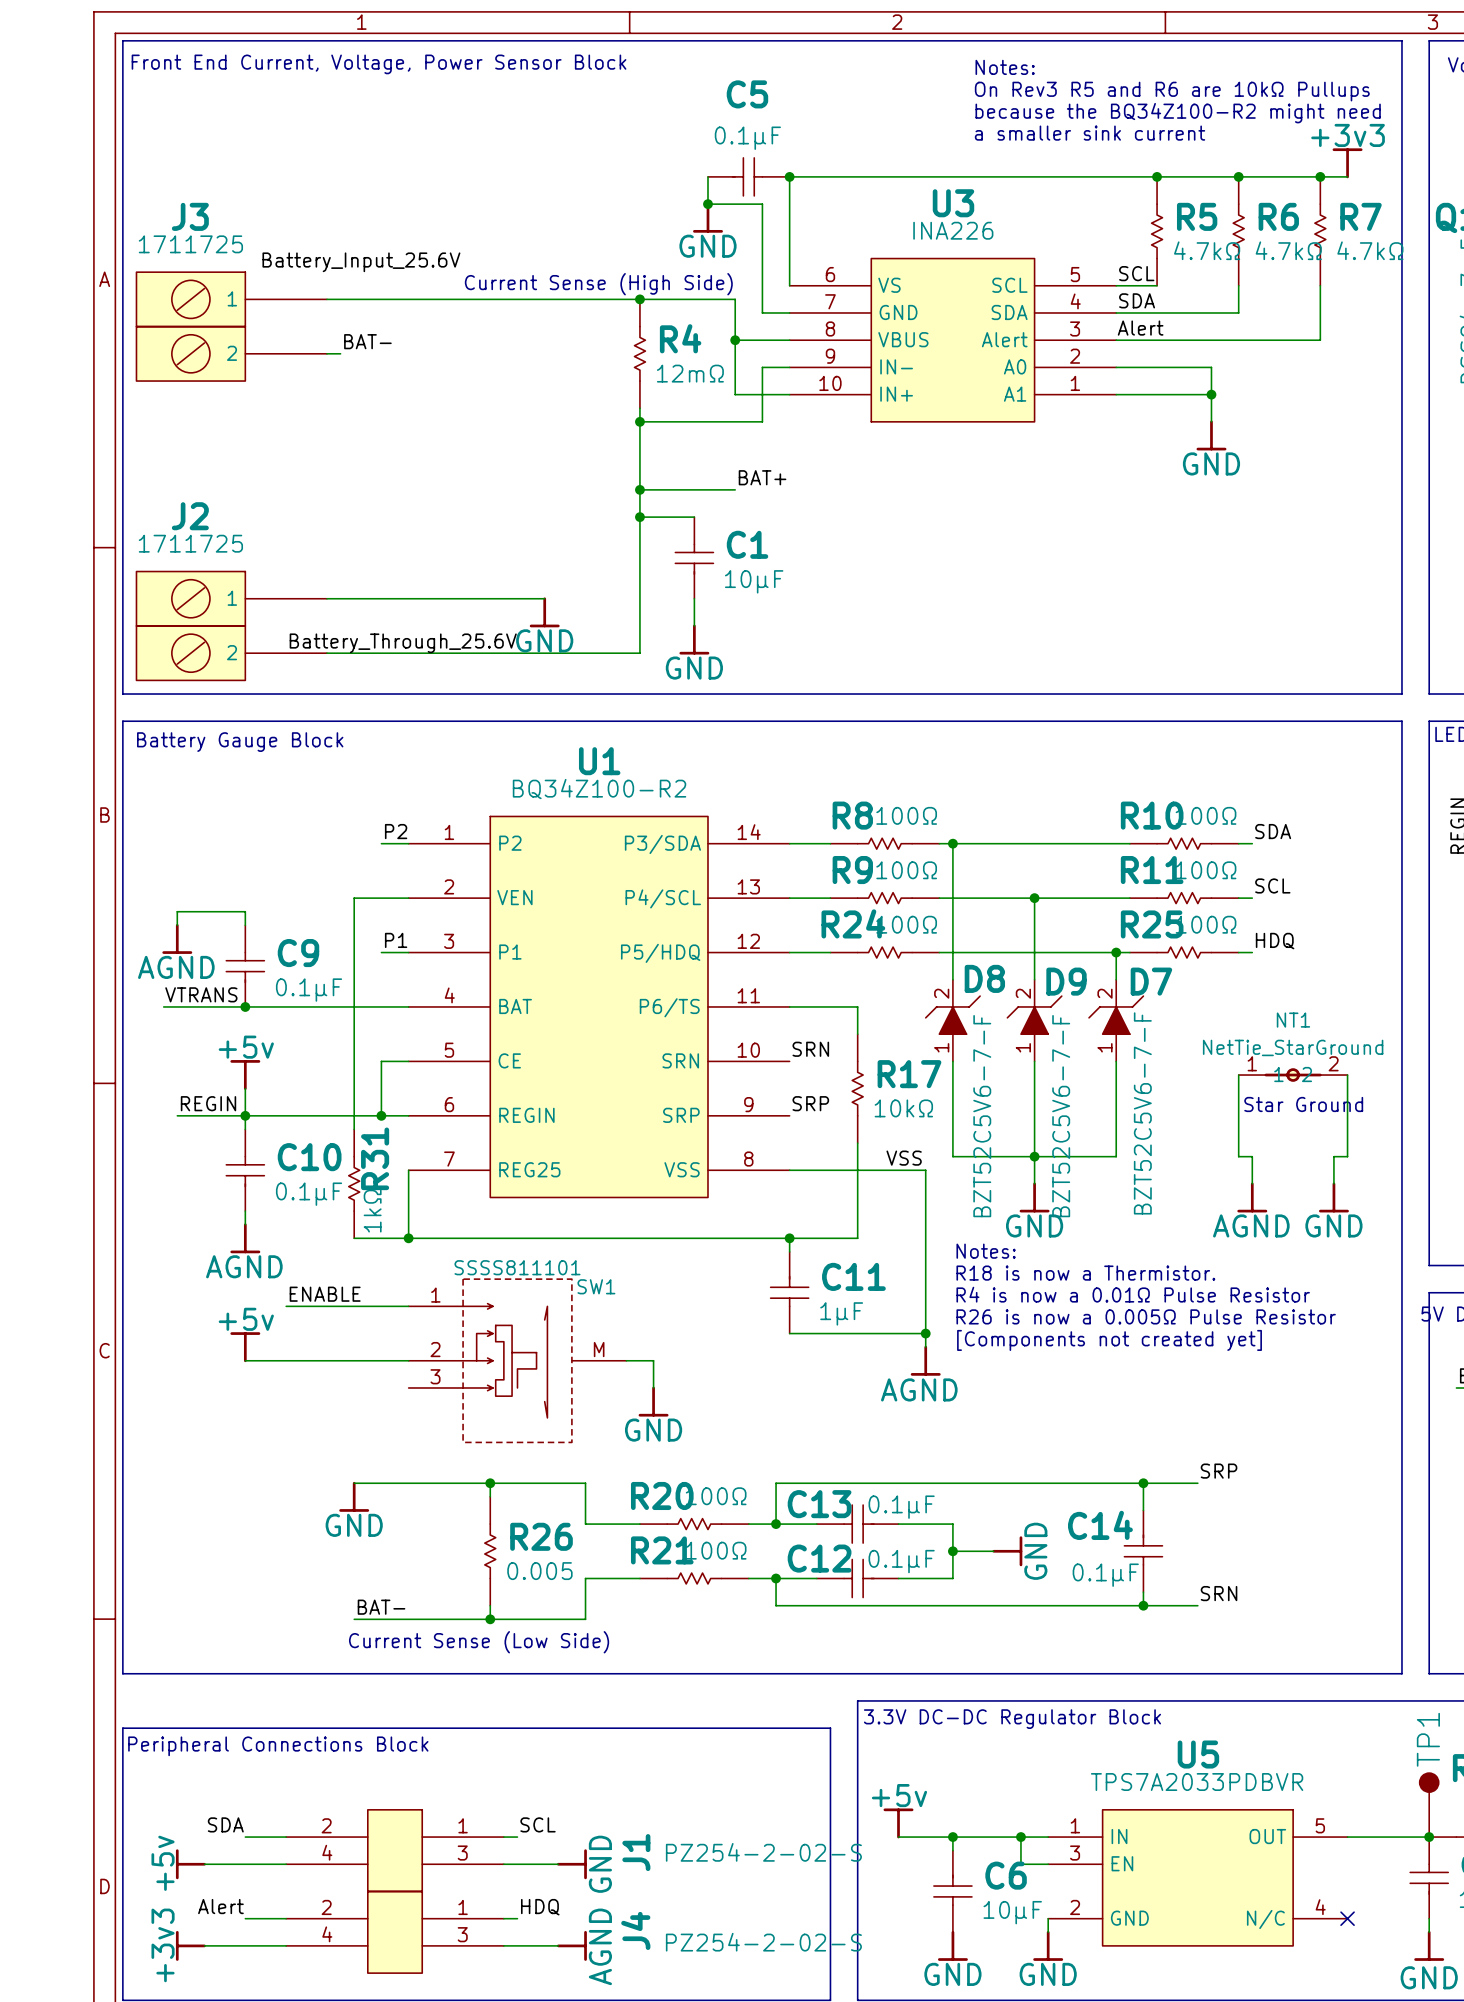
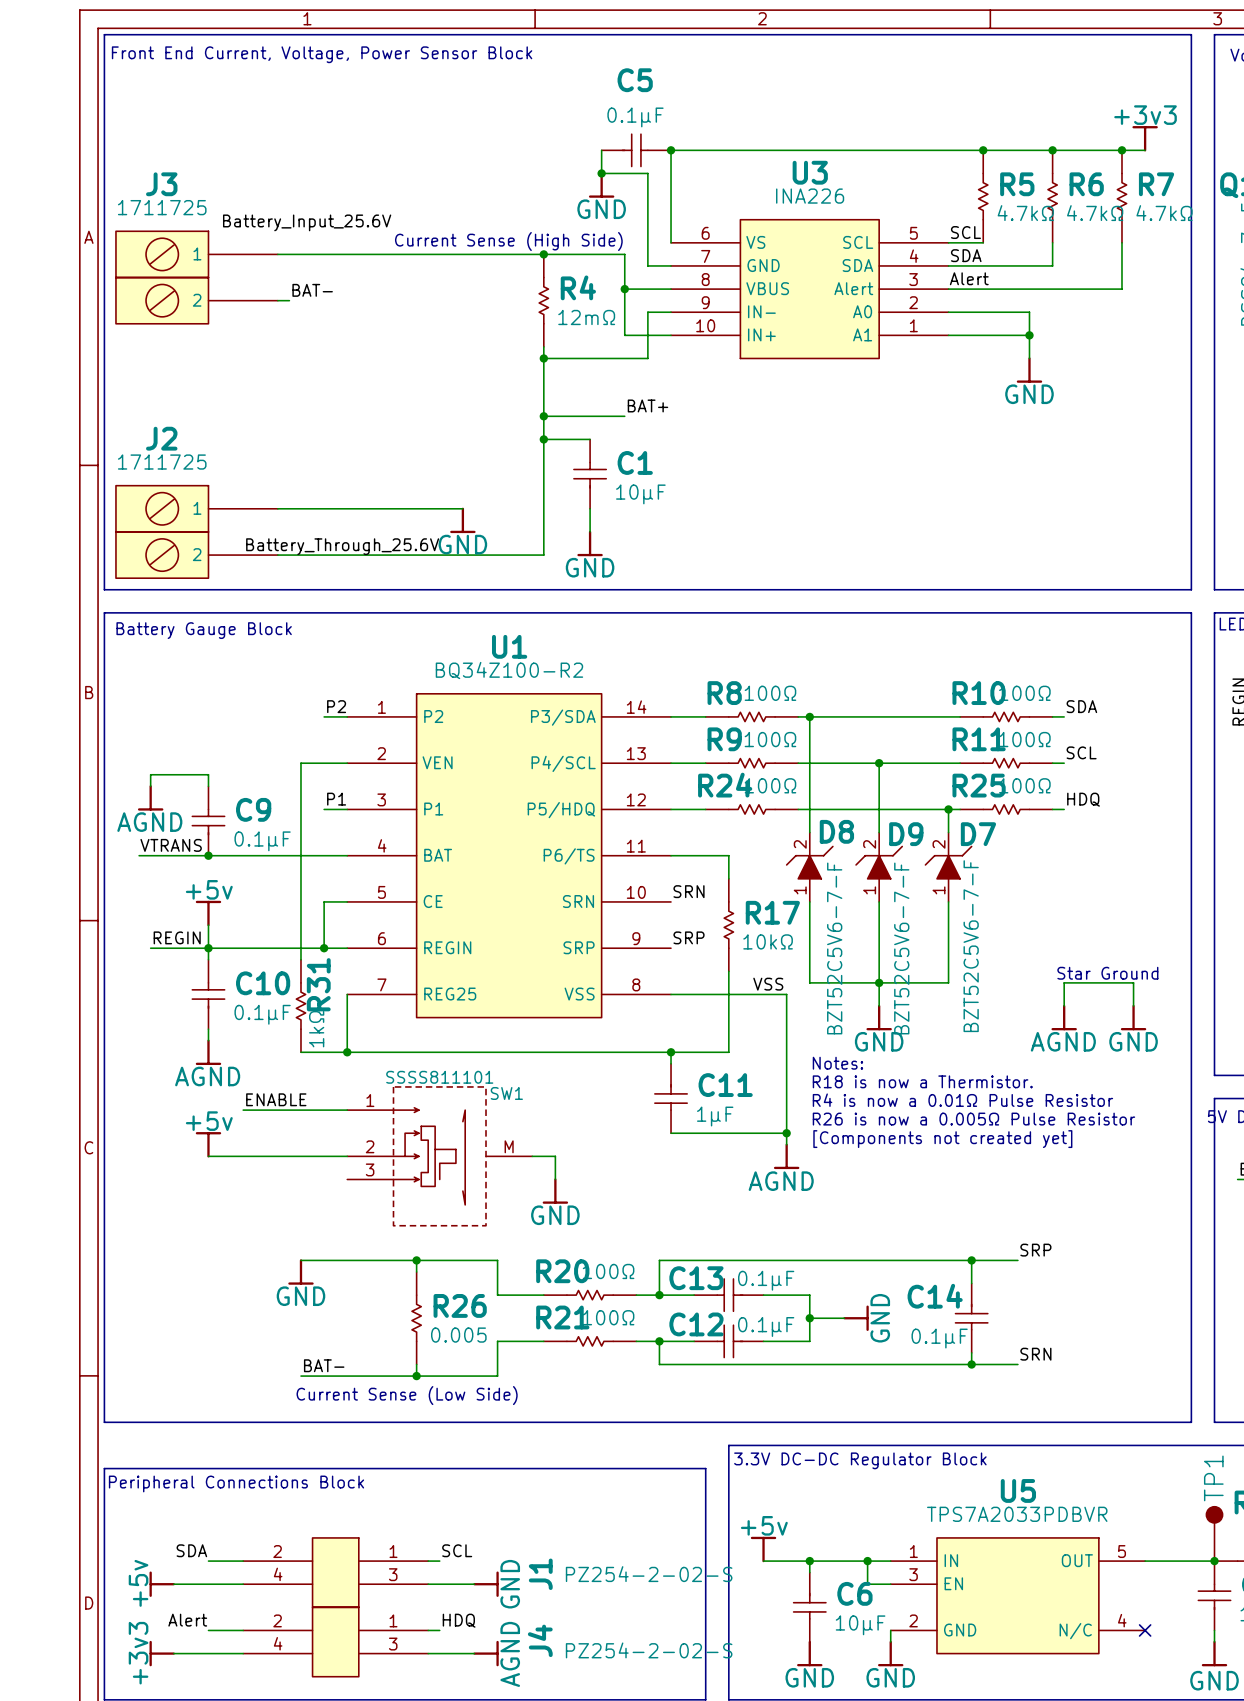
text: Notes: (1005, 67) -> none
text: On Rev3 R5 and R6 are 10kΩ Pullups (1172, 91) -> none
text: because the BQ34Z100-R2 might need (1178, 113) -> none
text: a smaller sink current (1090, 133) -> none
wire: (1238, 1075) (1238, 1156) (1252, 1156) -> (1133, 982) (1064, 982)
NT1: NetTie_StarGround (1293, 1075) -> none
wire: (1347, 1075) (1347, 1156) (1333, 1156) -> none
text position: Star Ground (1303, 1104) -> Star Ground (1107, 973)

